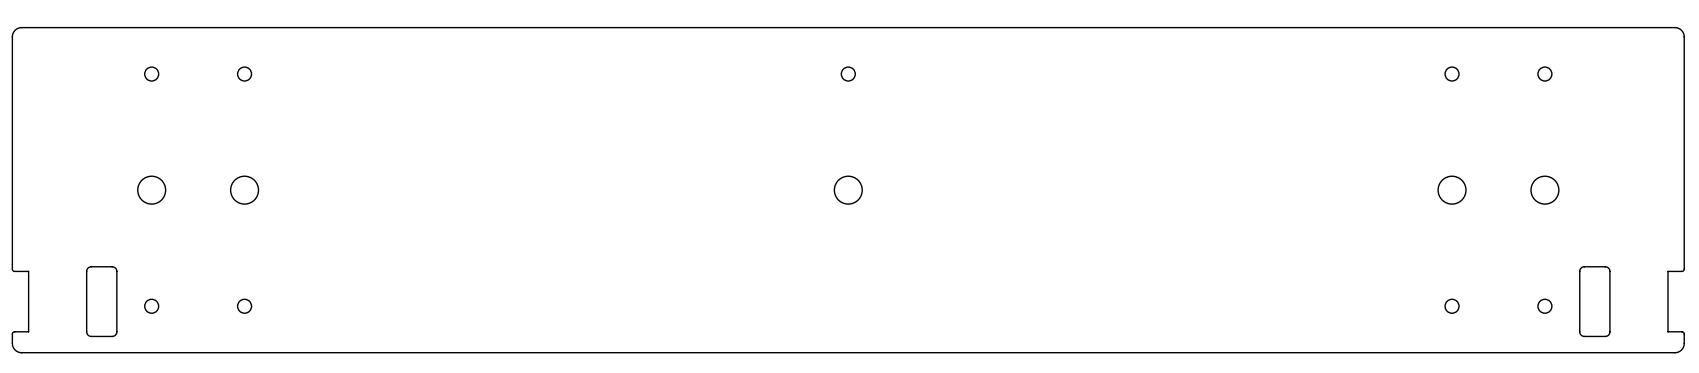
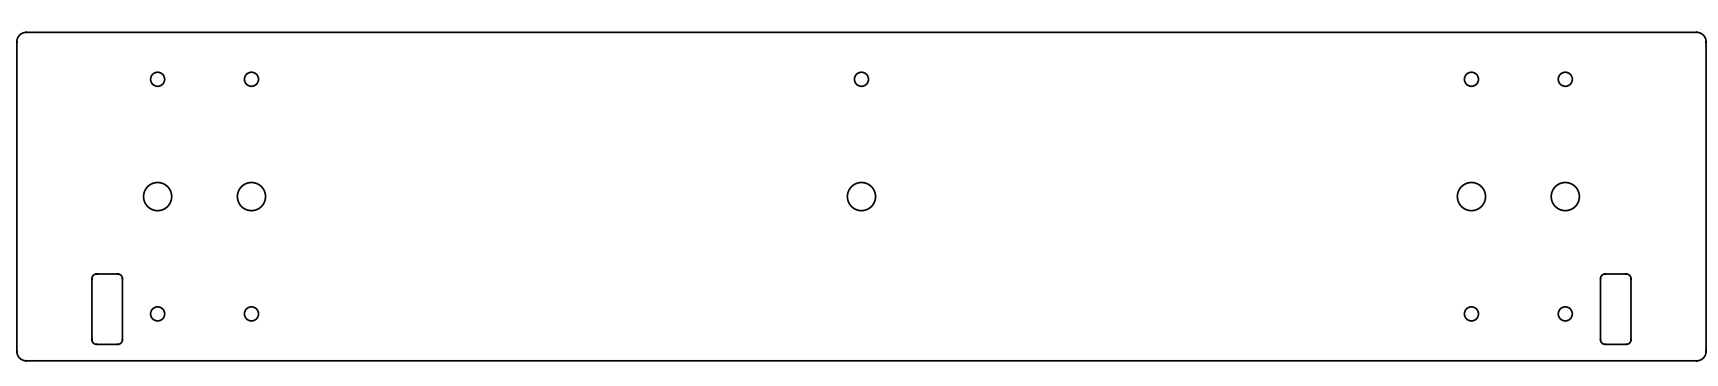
board edge: (12, 269) (14, 271) (28, 271) (28, 331) (14, 331) (12, 334) -> (16, 276) (16, 342)
board edge: (1684, 269) (1682, 271) (1667, 271) (1667, 331) (1682, 331) (1684, 334) -> (1706, 276) (1706, 342)

